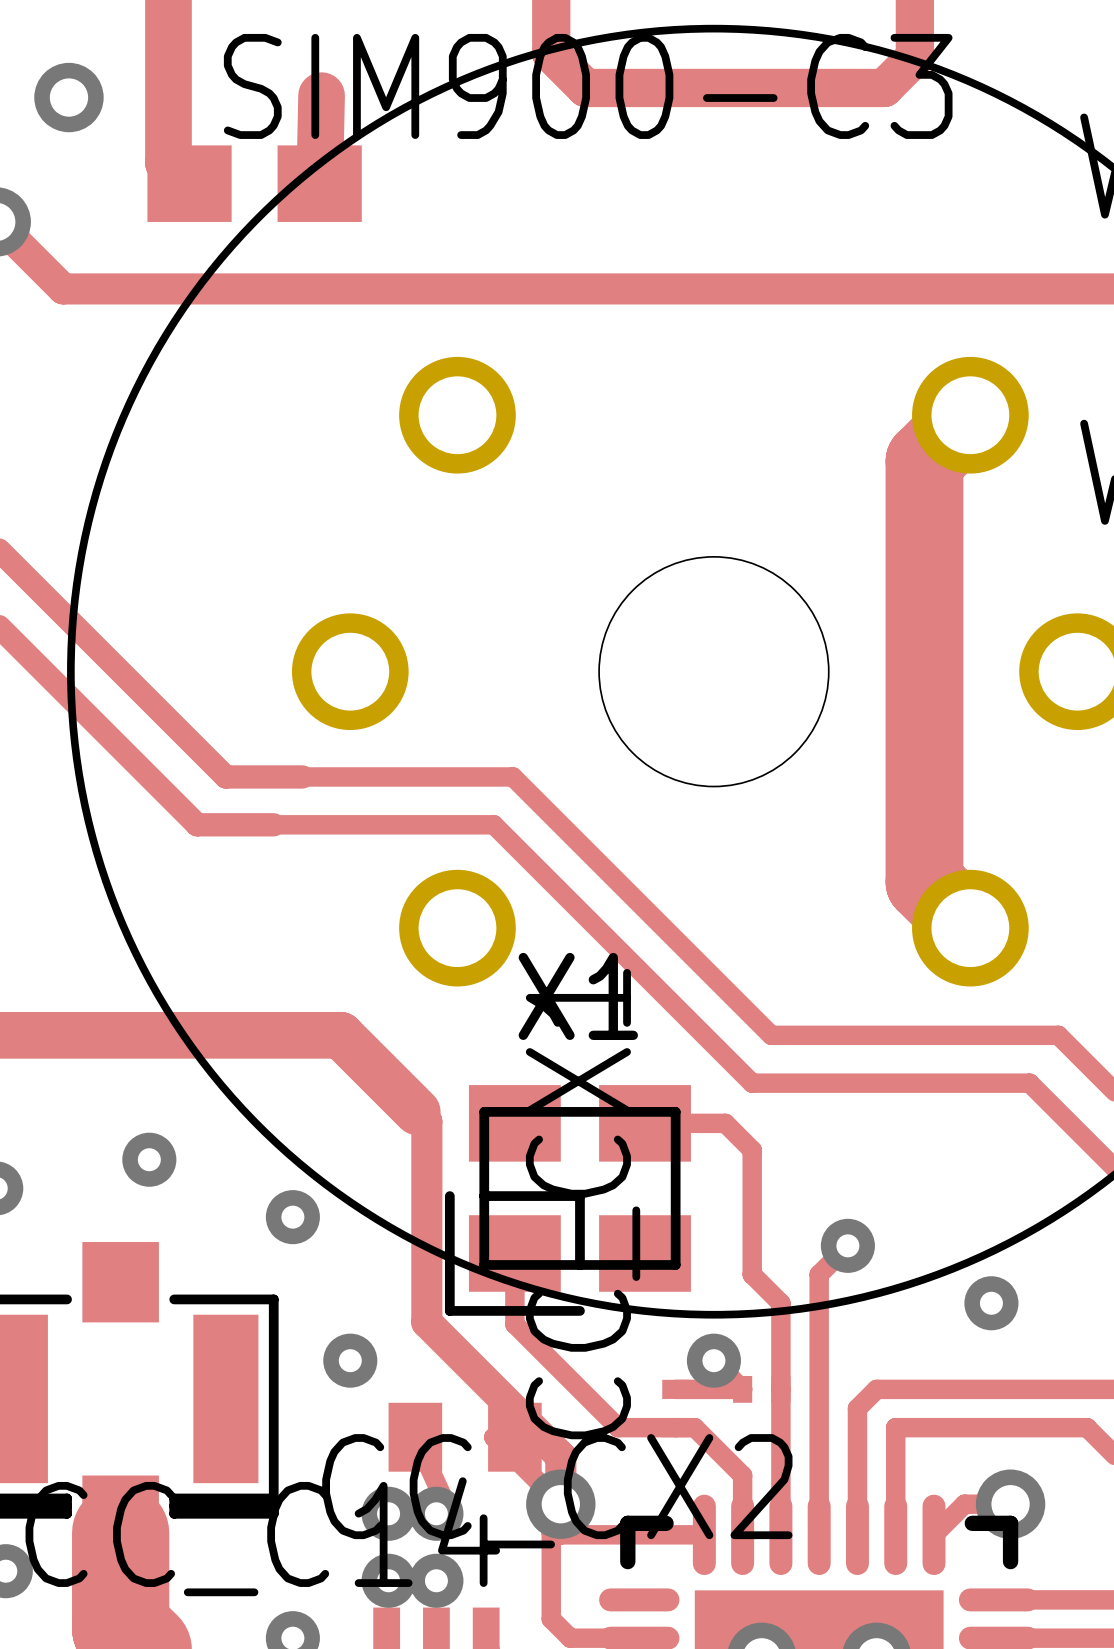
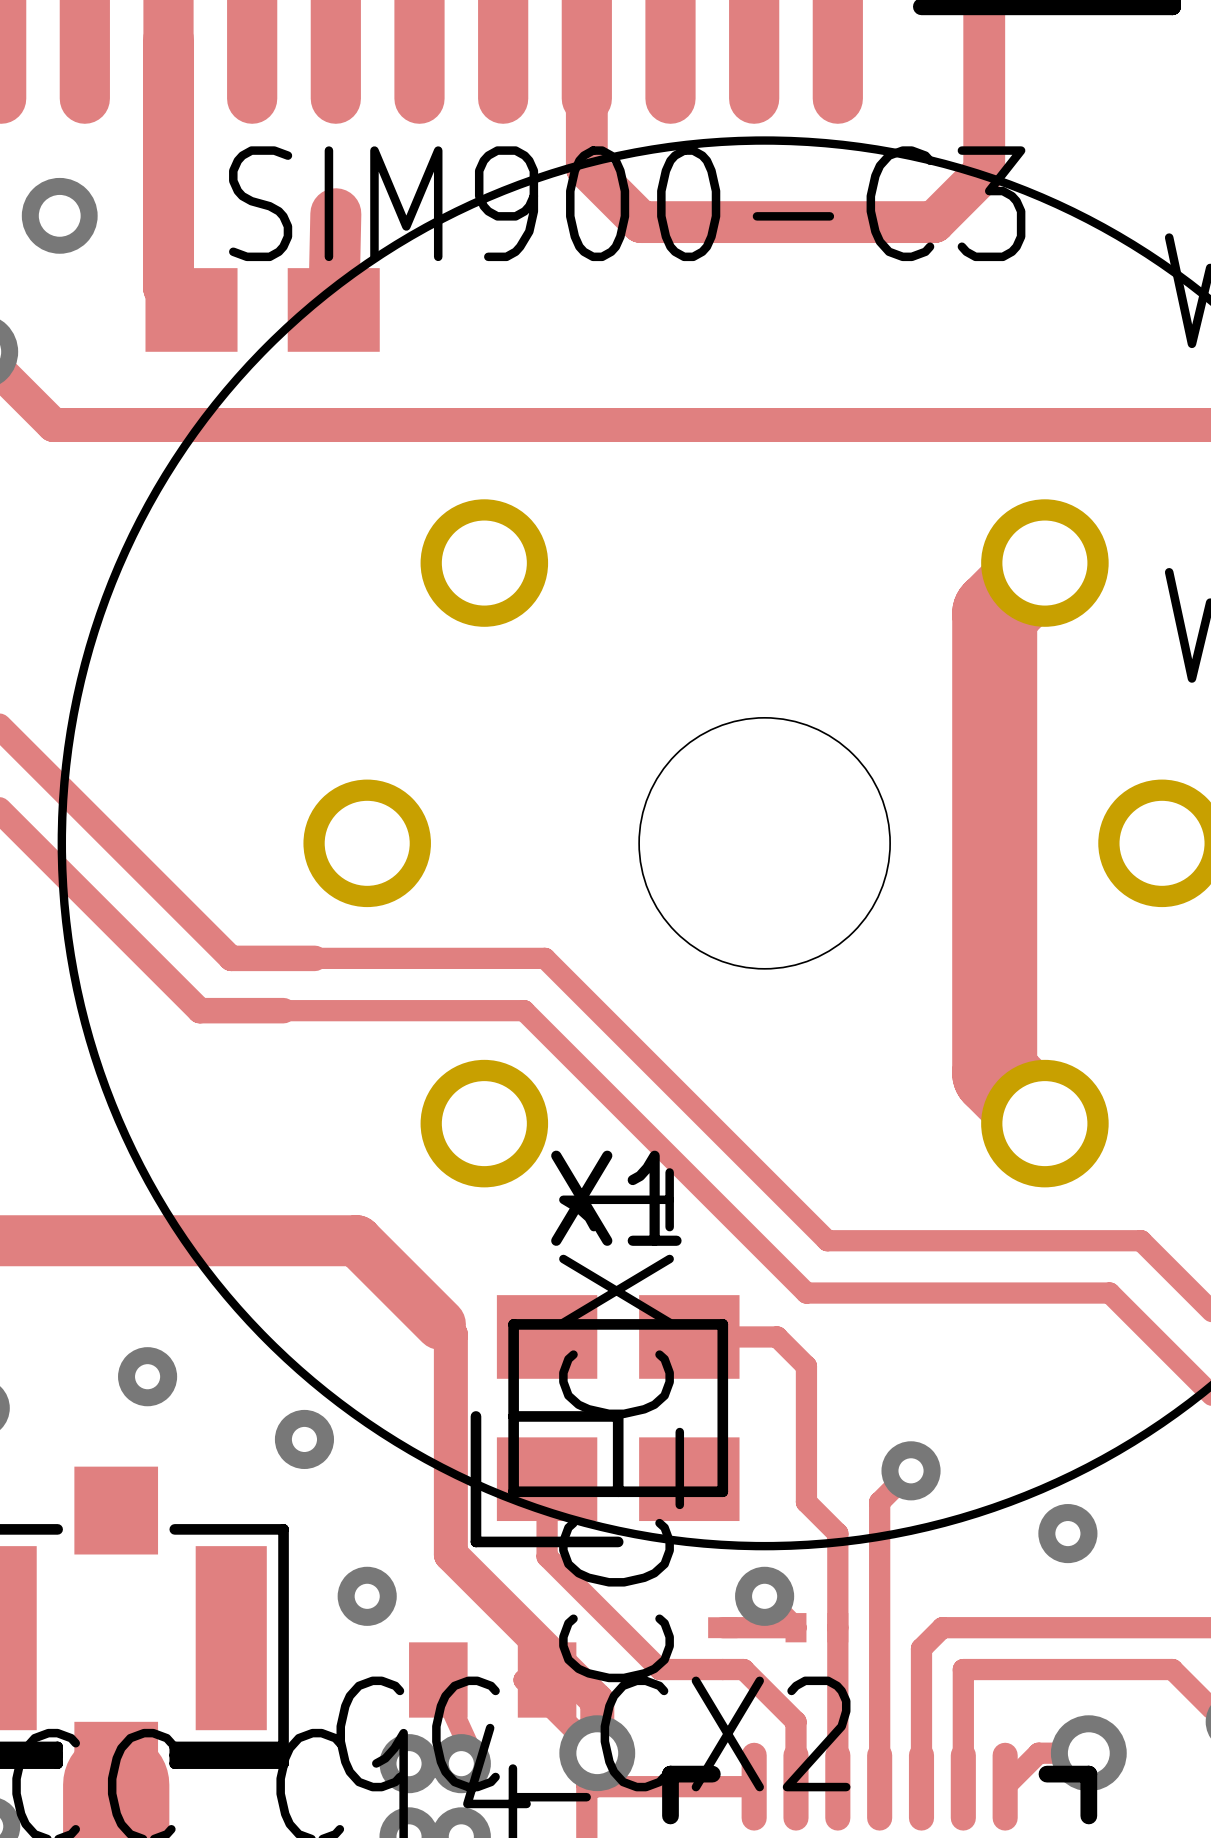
track: (585, 87) (884, 87) -> (624, 205) (641, 222) (934, 222) (950, 205)

